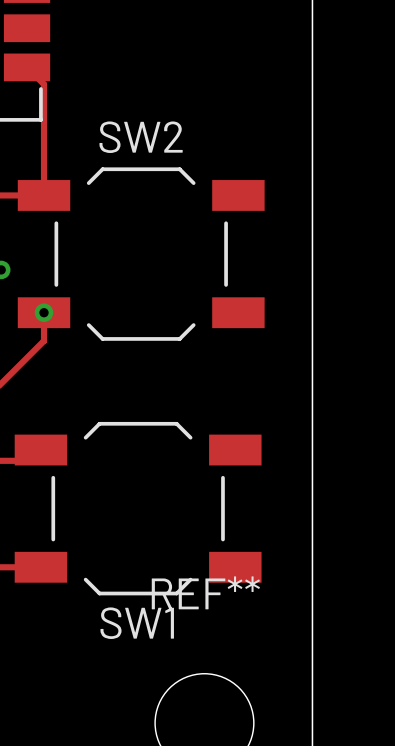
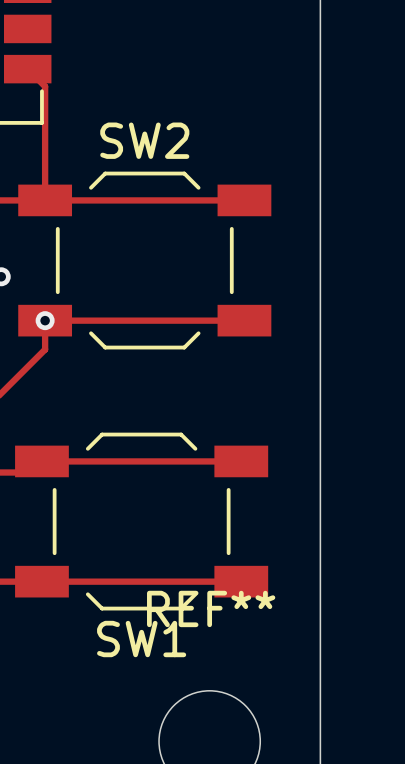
track: none -> (45, 200) (244, 200)
track: none -> (45, 320) (244, 320)
track: none -> (41, 461) (241, 461)
track: none -> (41, 581) (241, 581)

